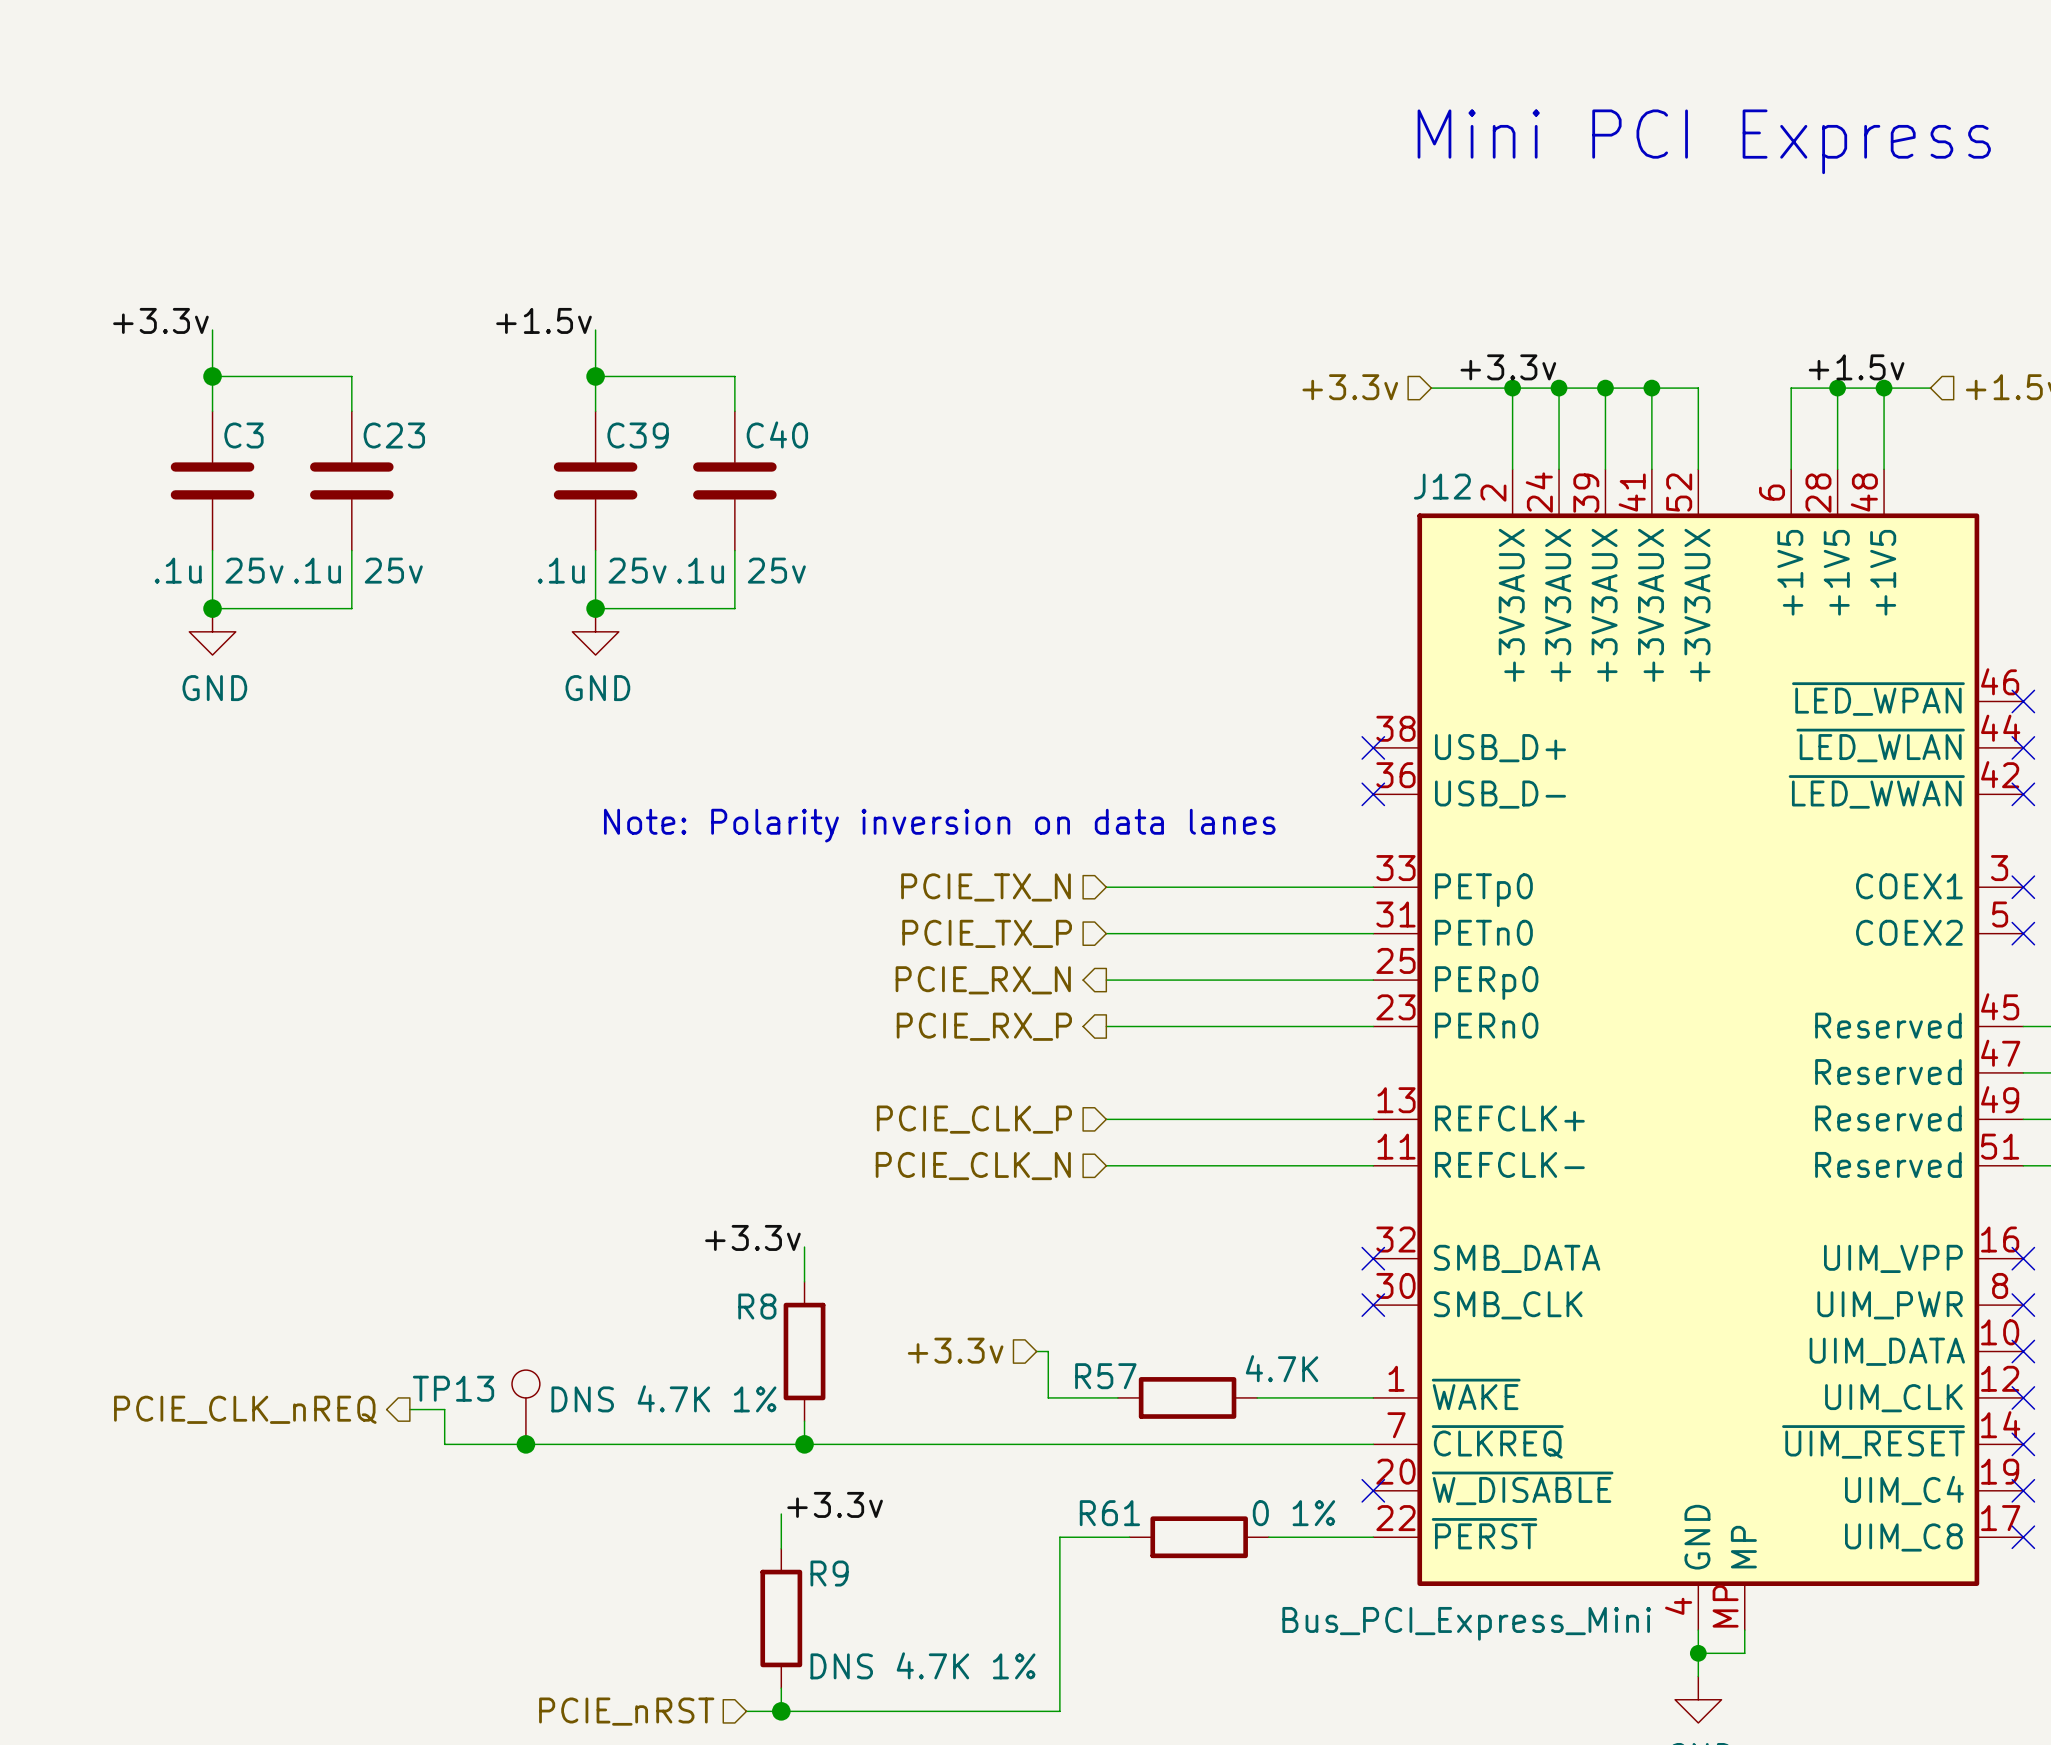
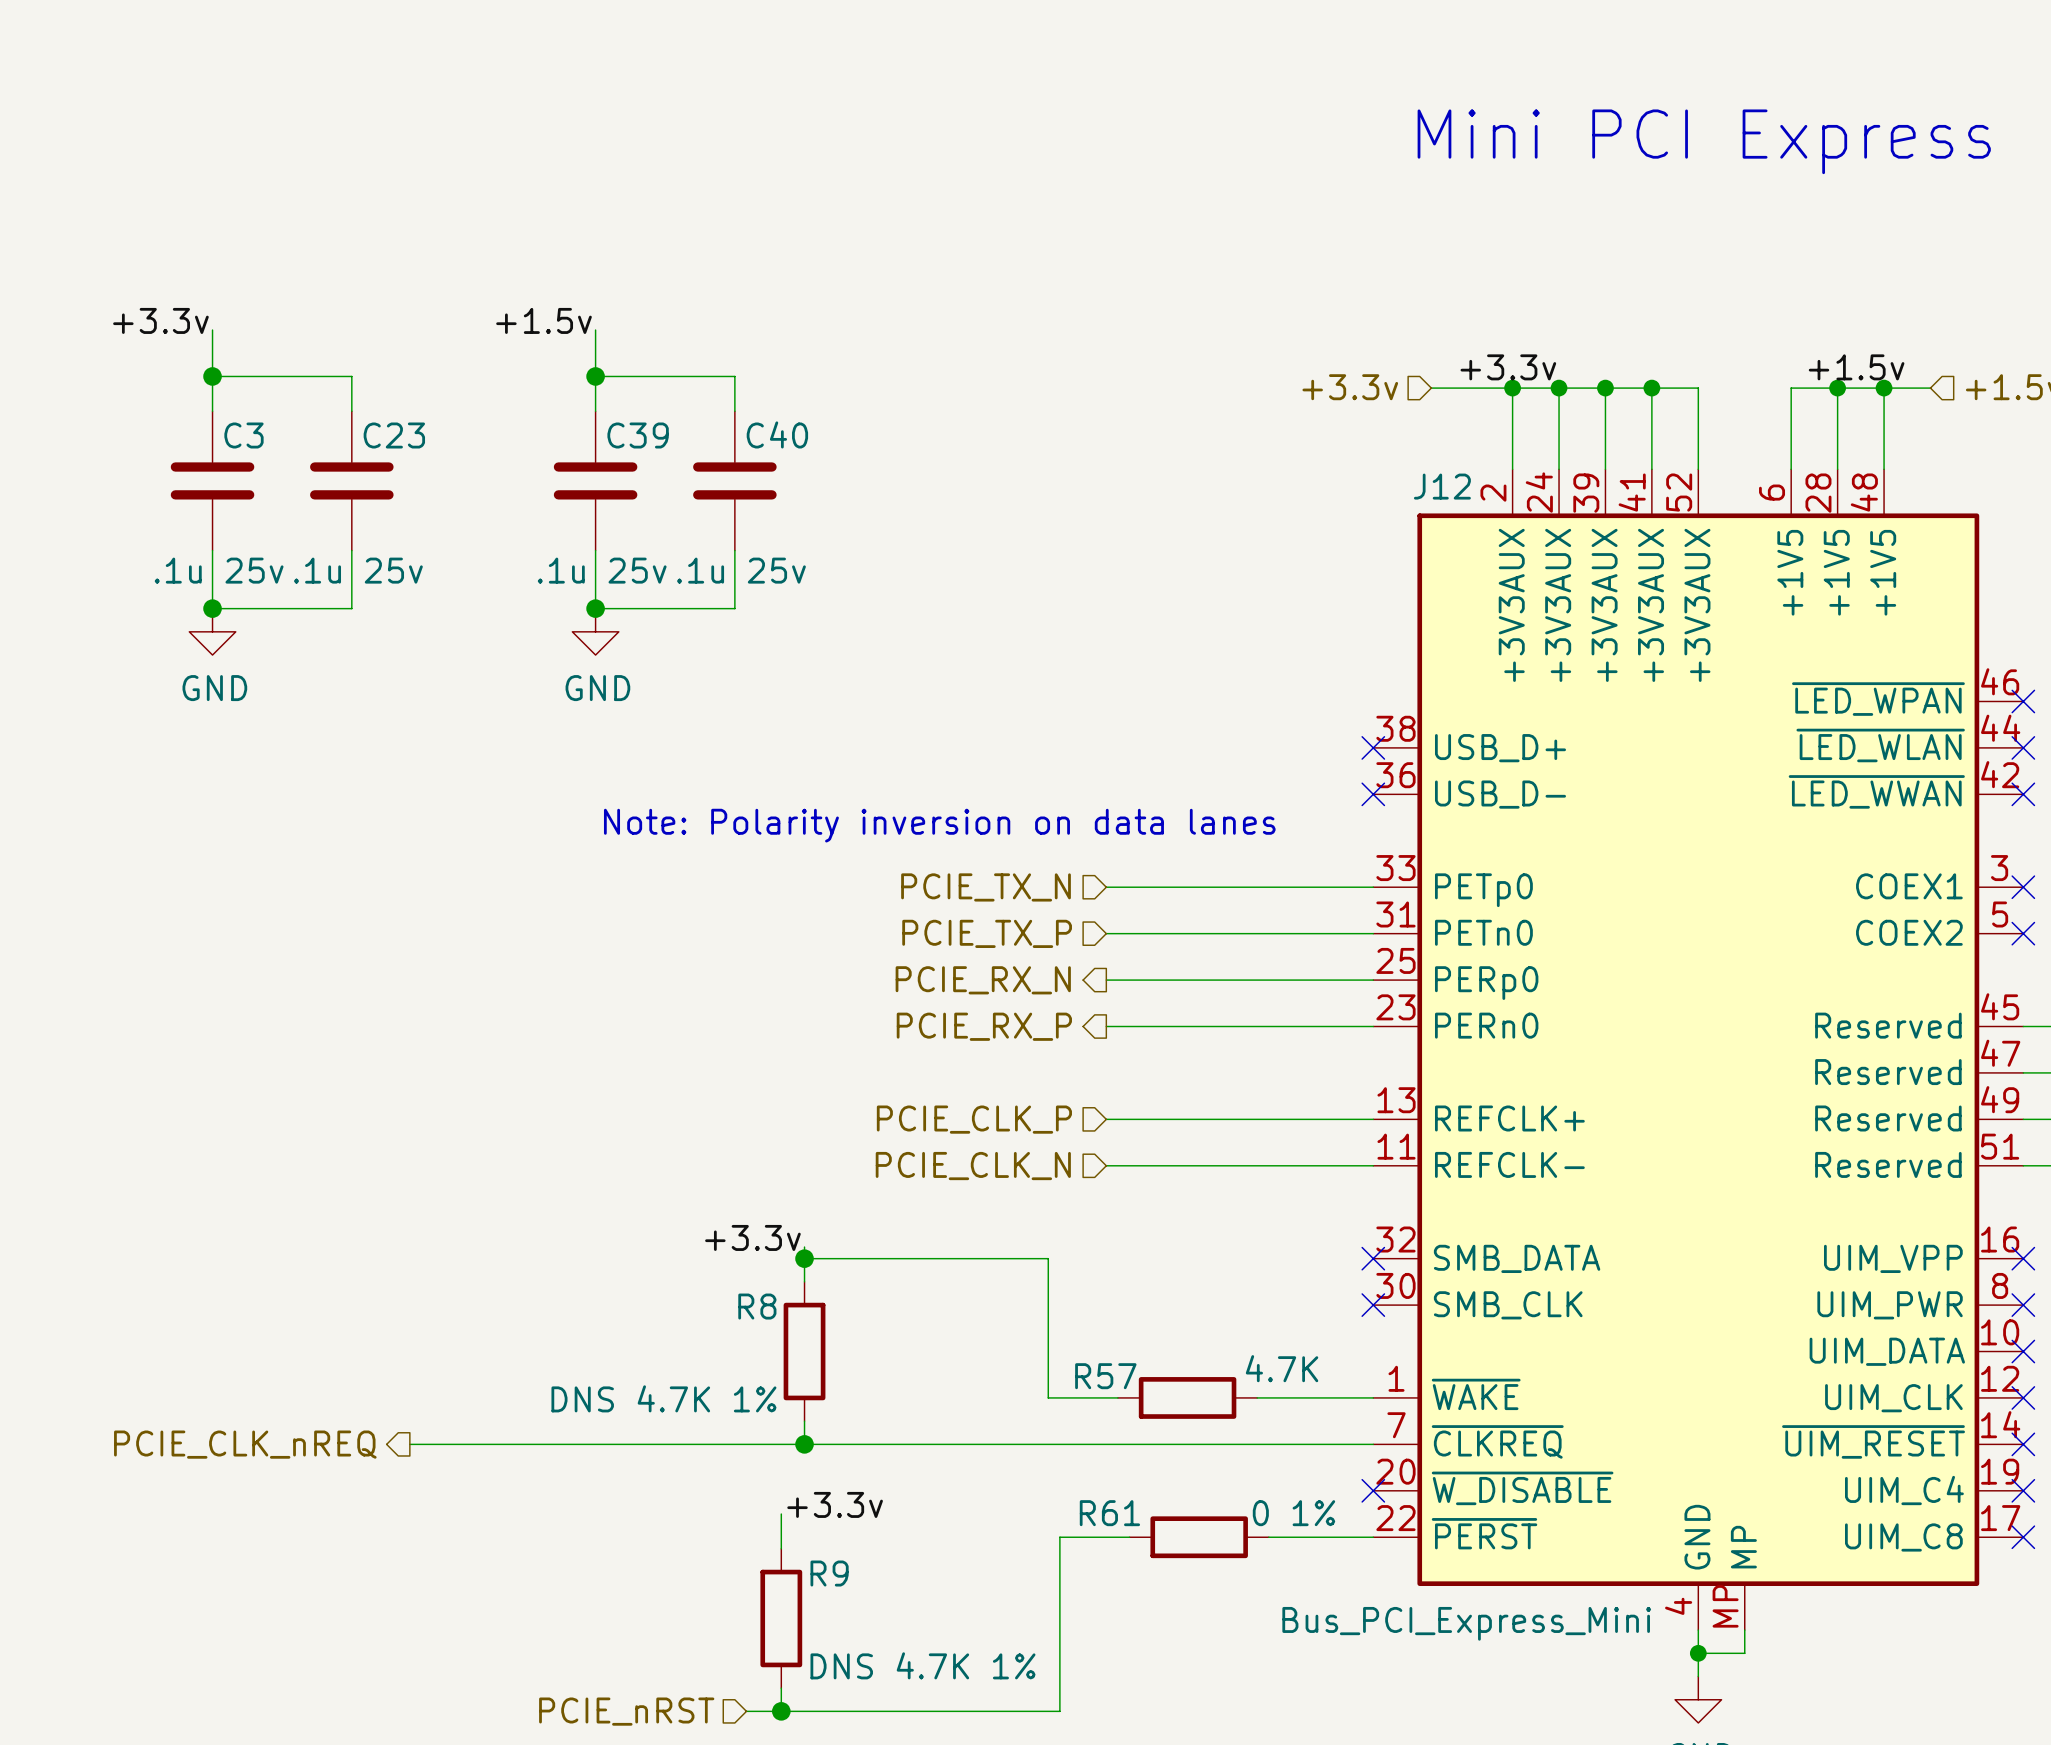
junction: none -> (804, 1258)
hierarchical label: +3.3v (955, 1350) -> none
wire: (1036, 1351) (1048, 1351) -> (804, 1258) (1048, 1258) (1048, 1351)
TP13: (525, 1407) -> none
hierarchical label position: PCIE_CLK_nREQ (245, 1409) -> PCIE_CLK_nREQ (245, 1444)
wire: (409, 1409) (444, 1409) (444, 1444) -> (409, 1444) (444, 1444)
junction: (525, 1444) -> none

